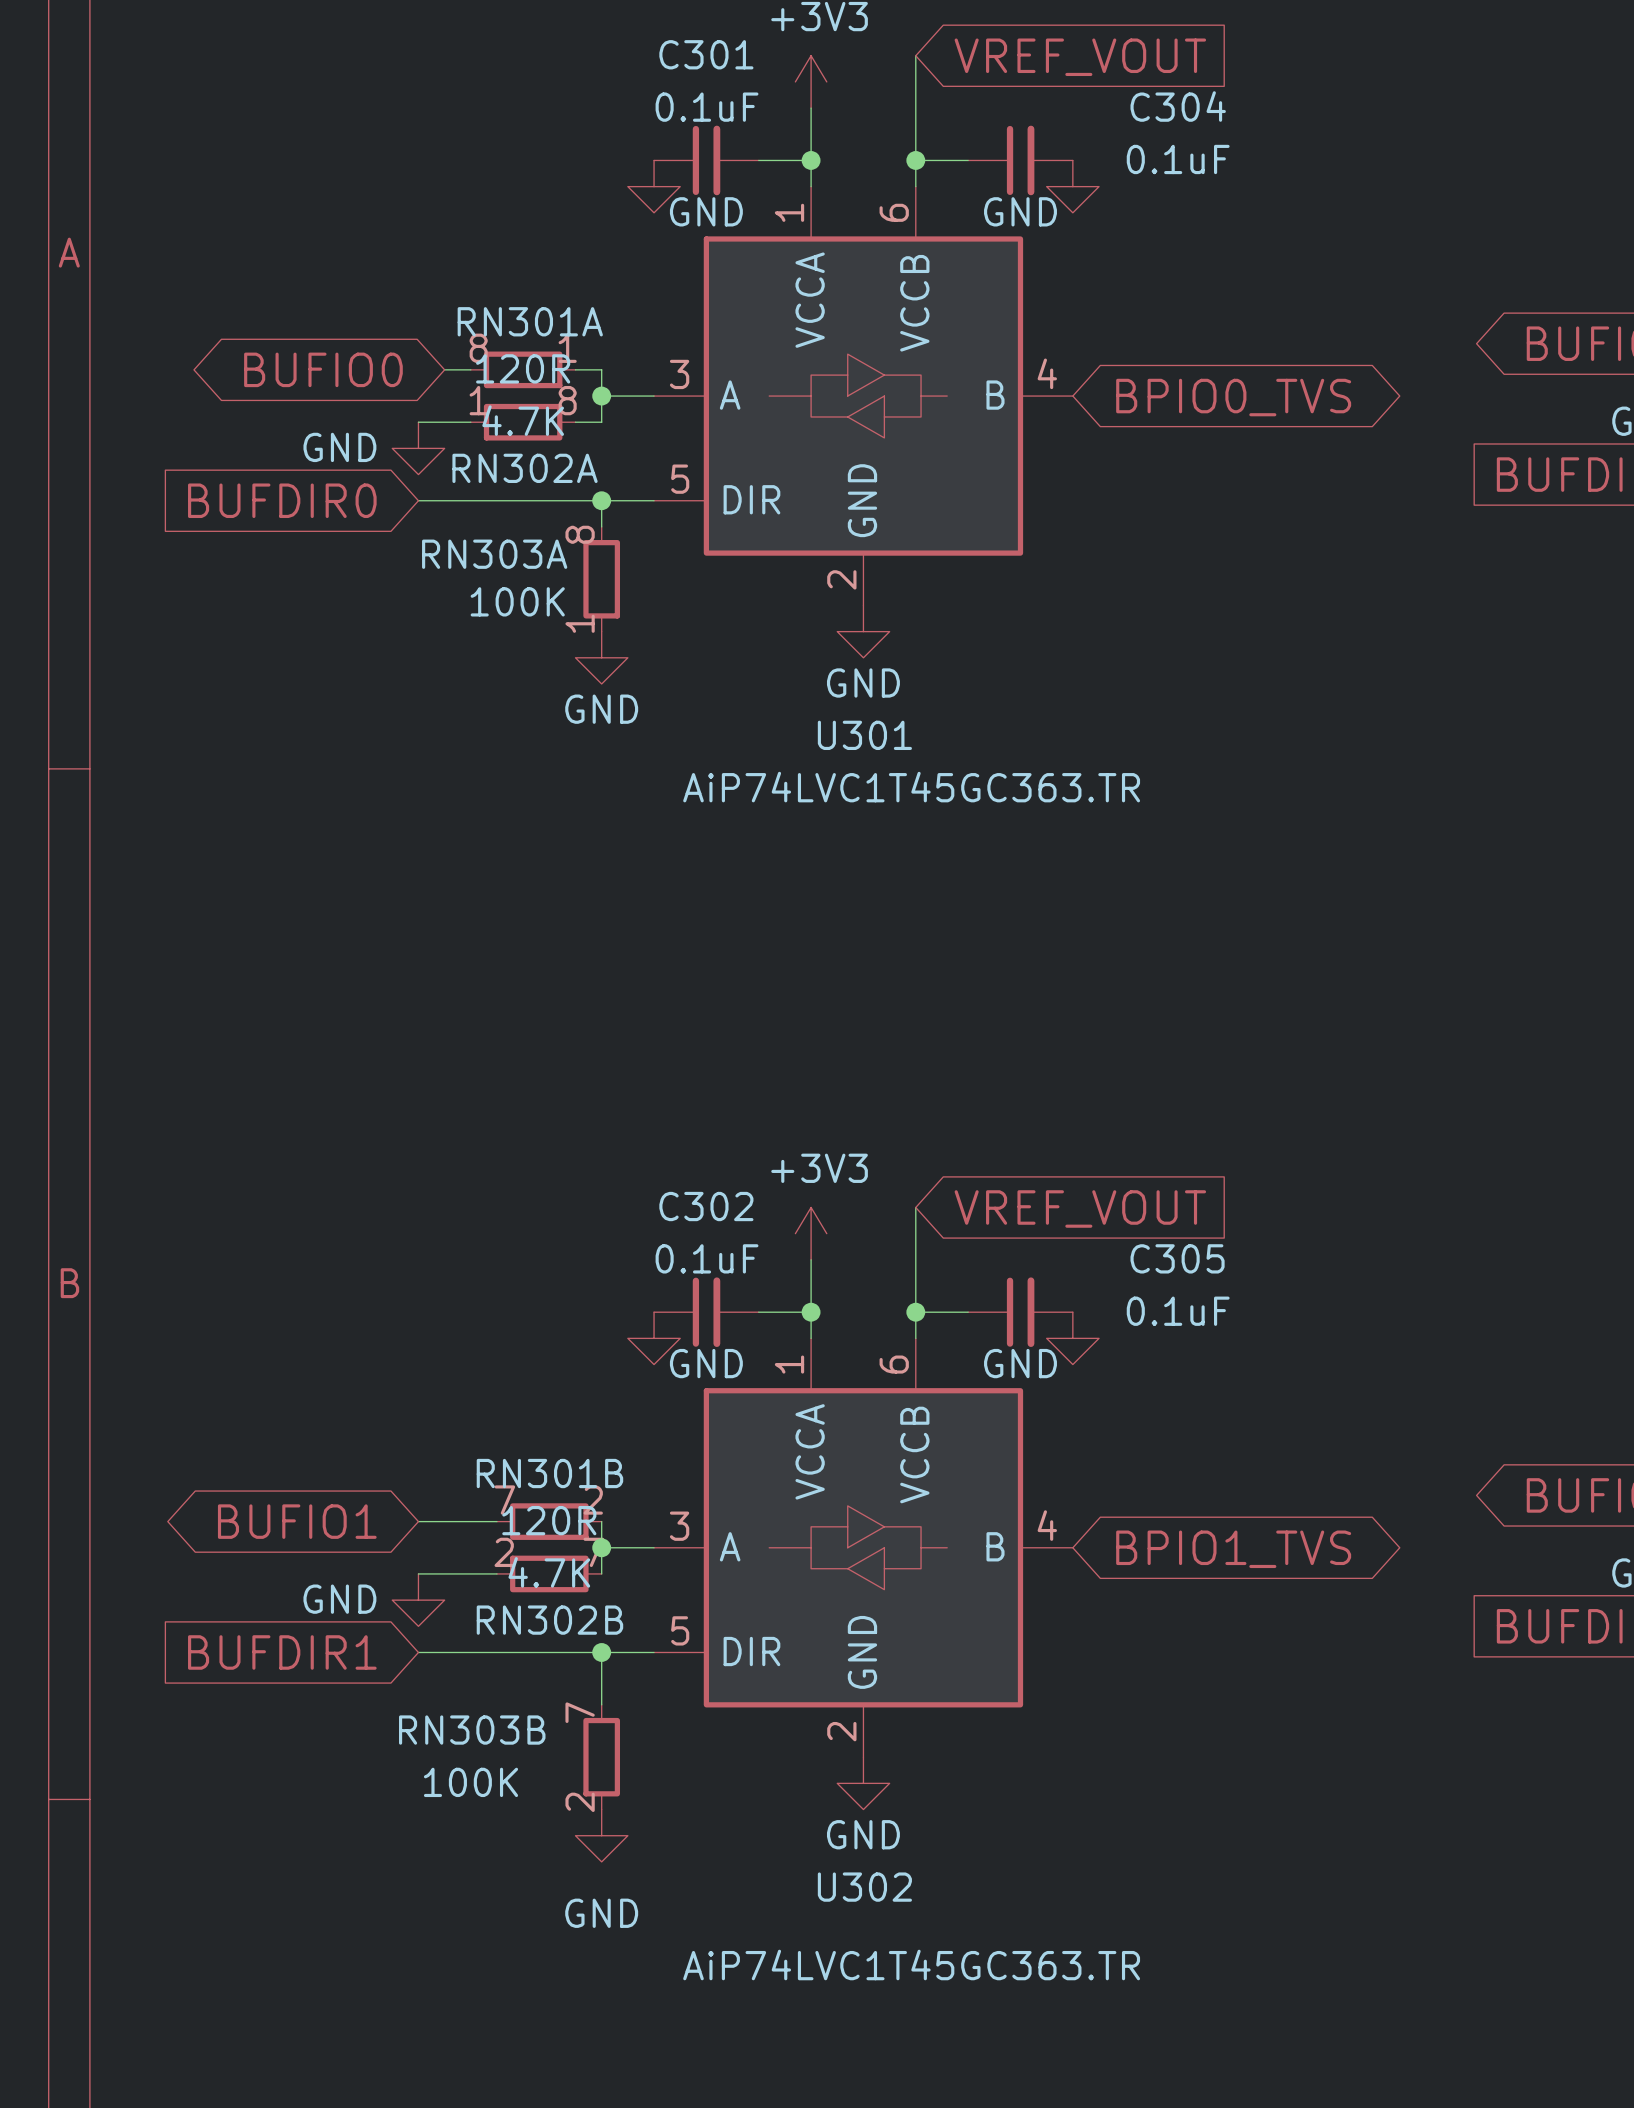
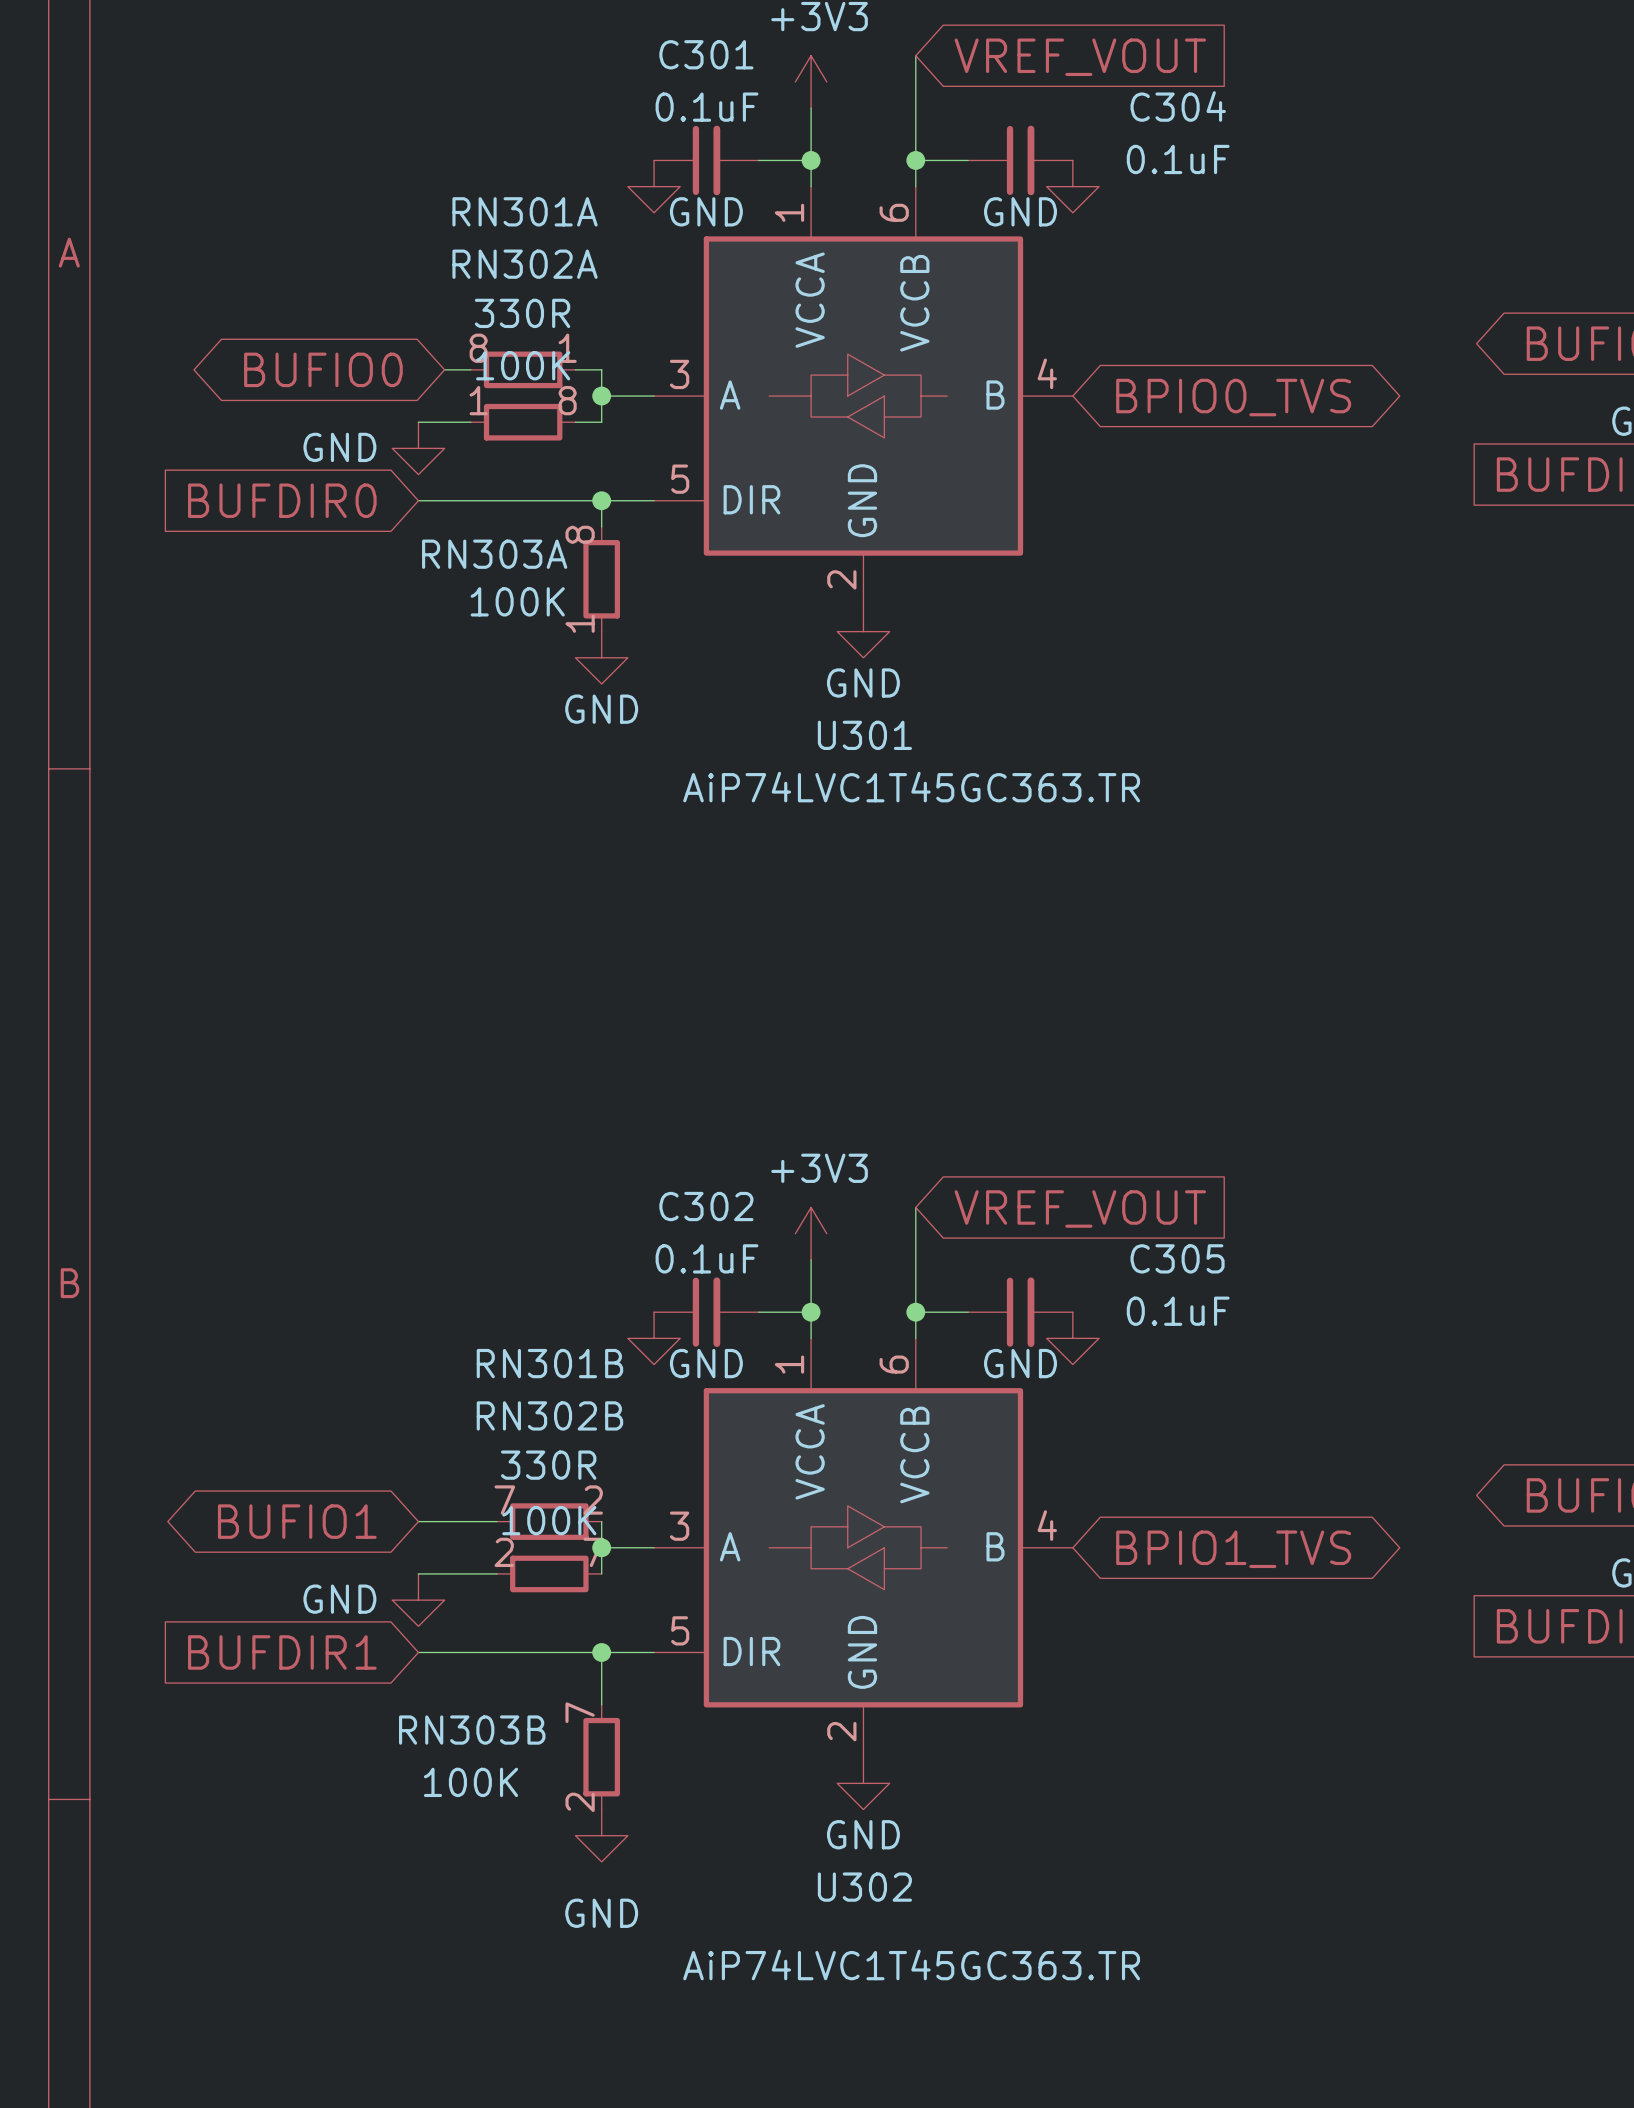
RN301A name position: RN301A (530, 321) -> RN301A (525, 211)
RN301A value: 120R (523, 368) -> 330R (522, 313)
RN302A value: 4.7K (523, 420) -> 100K (523, 365)
RN302A name position: RN302A (525, 468) -> RN302A (525, 264)
RN301B name position: RN301B (549, 1473) -> RN301B (549, 1363)
RN301B value: 120R (549, 1520) -> 330R (548, 1465)
RN302B value: 4.7K (549, 1572) -> 100K (549, 1520)
RN302B name position: RN302B (549, 1620) -> RN302B (549, 1415)

